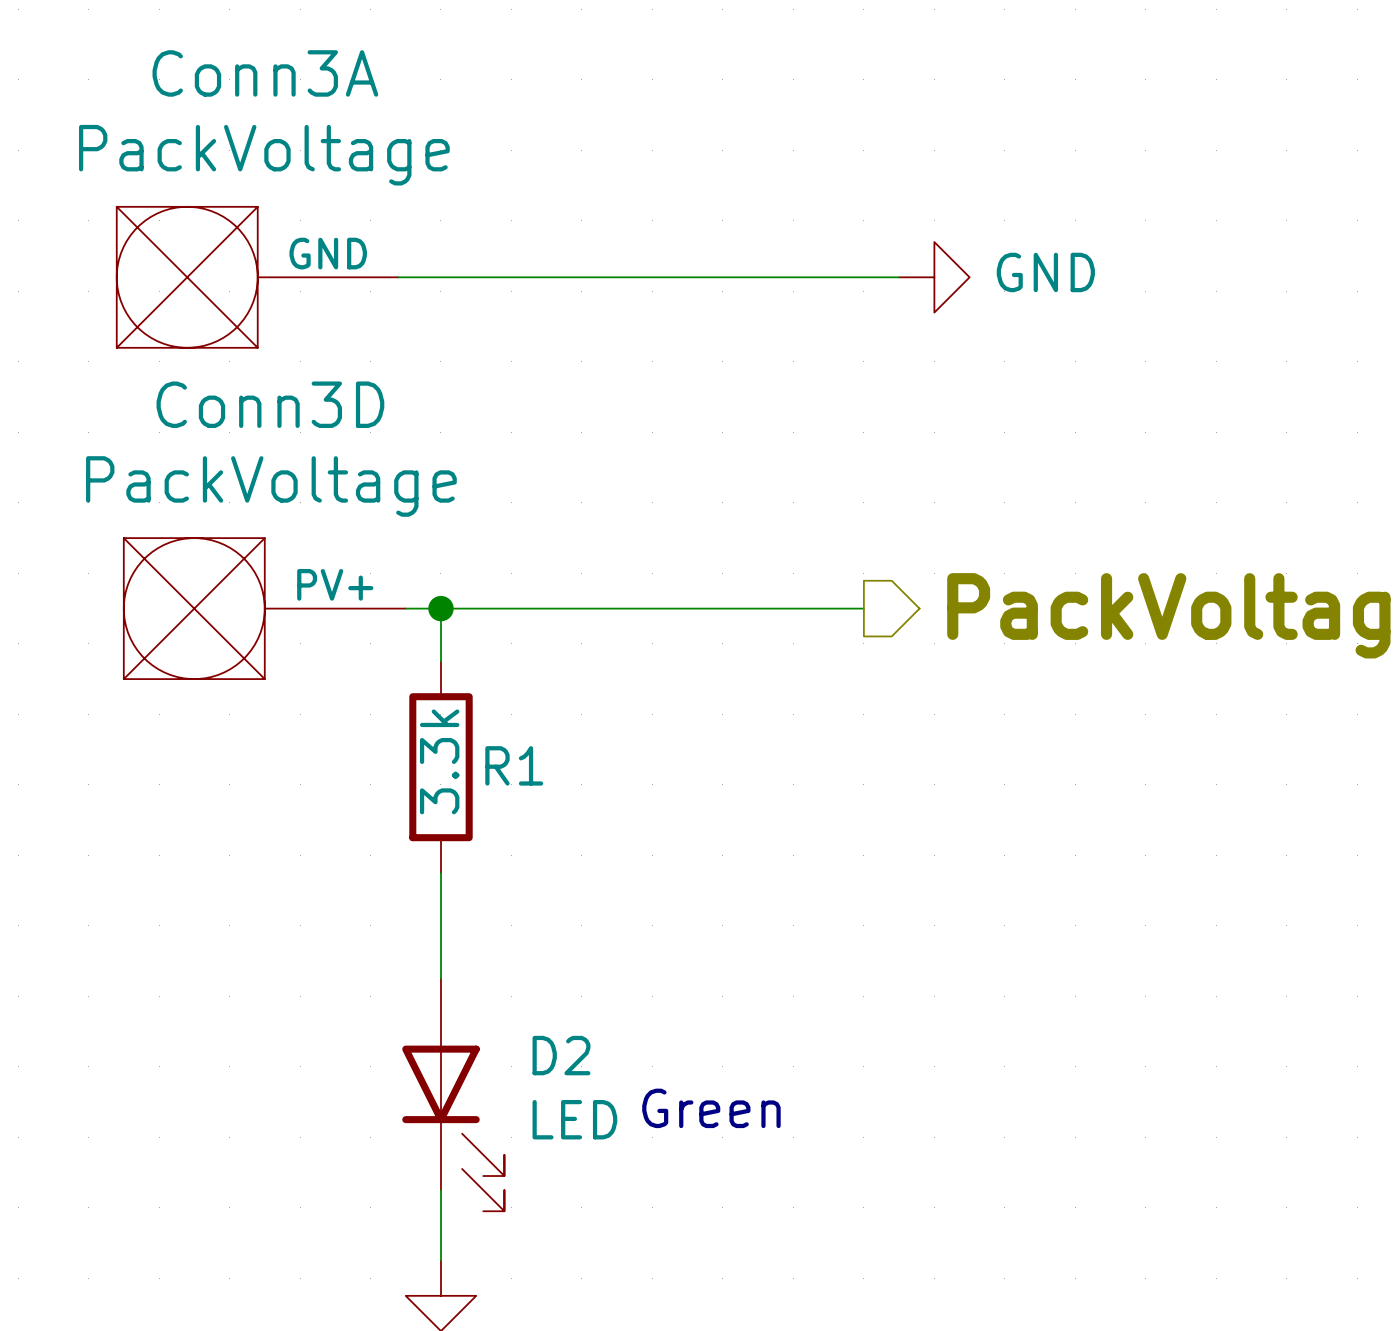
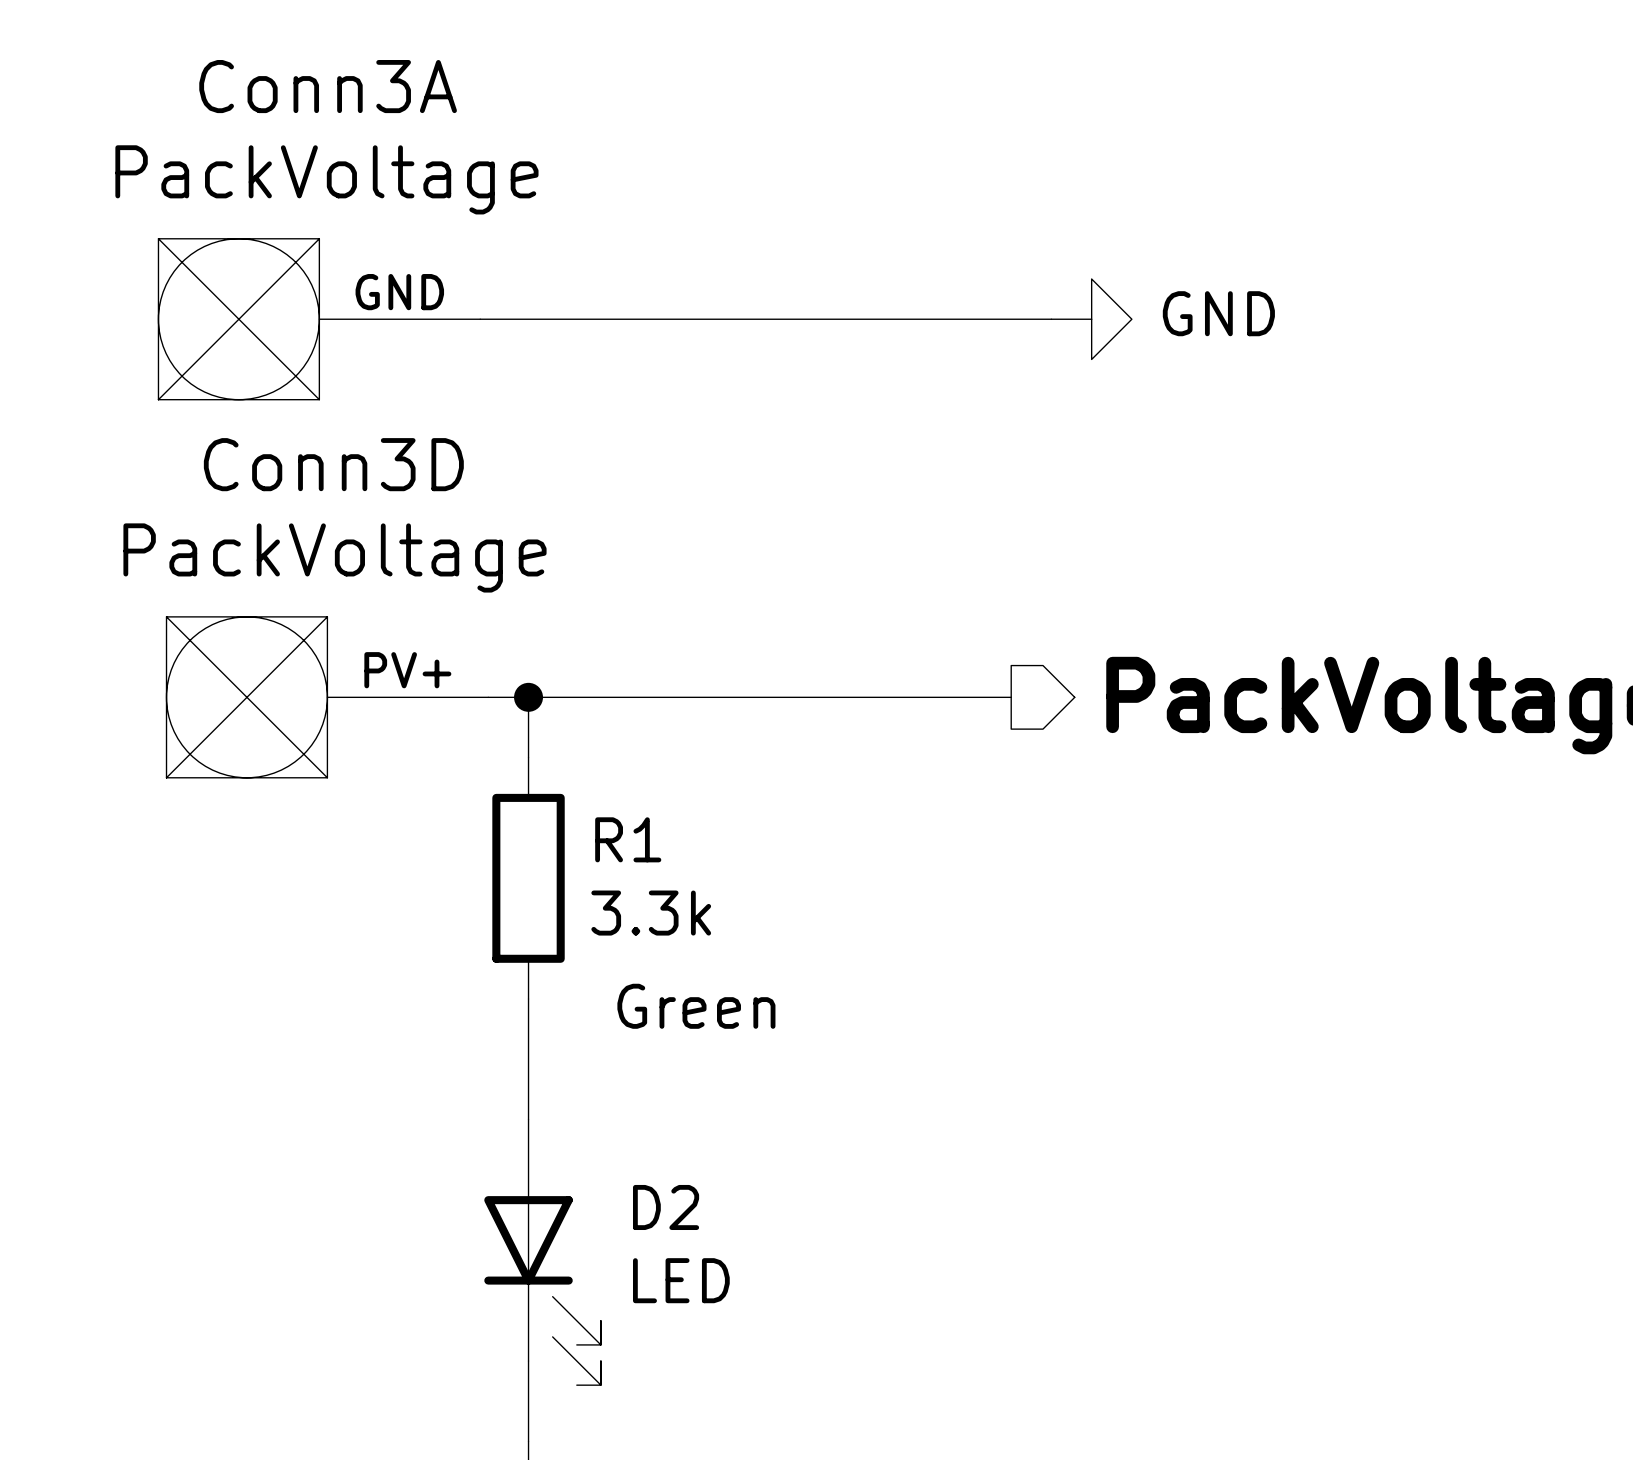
R1 value rotation: 0° (439, 761) -> 90° clockwise (651, 913)
R1 name position: R1 (514, 765) -> R1 (628, 839)
text position: Green (711, 1108) -> Green (696, 1006)

